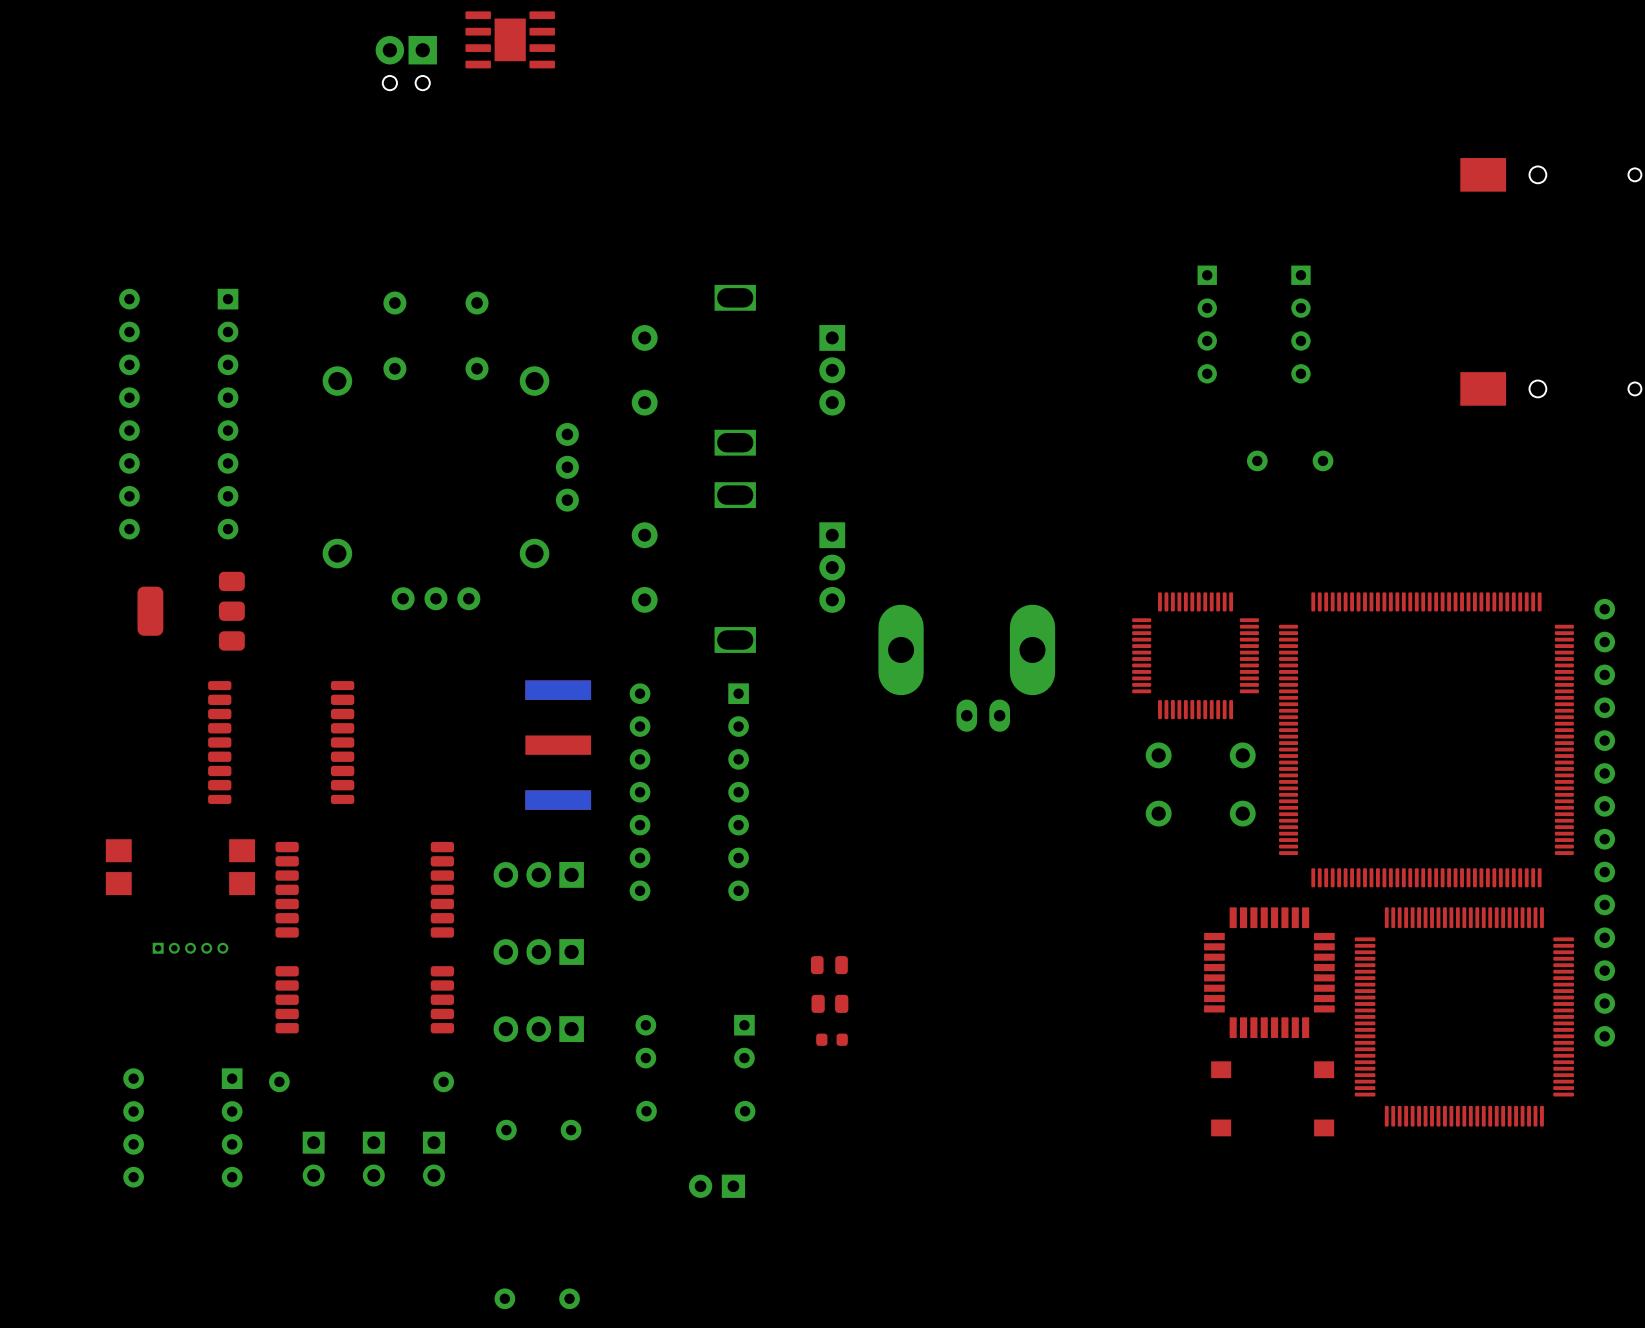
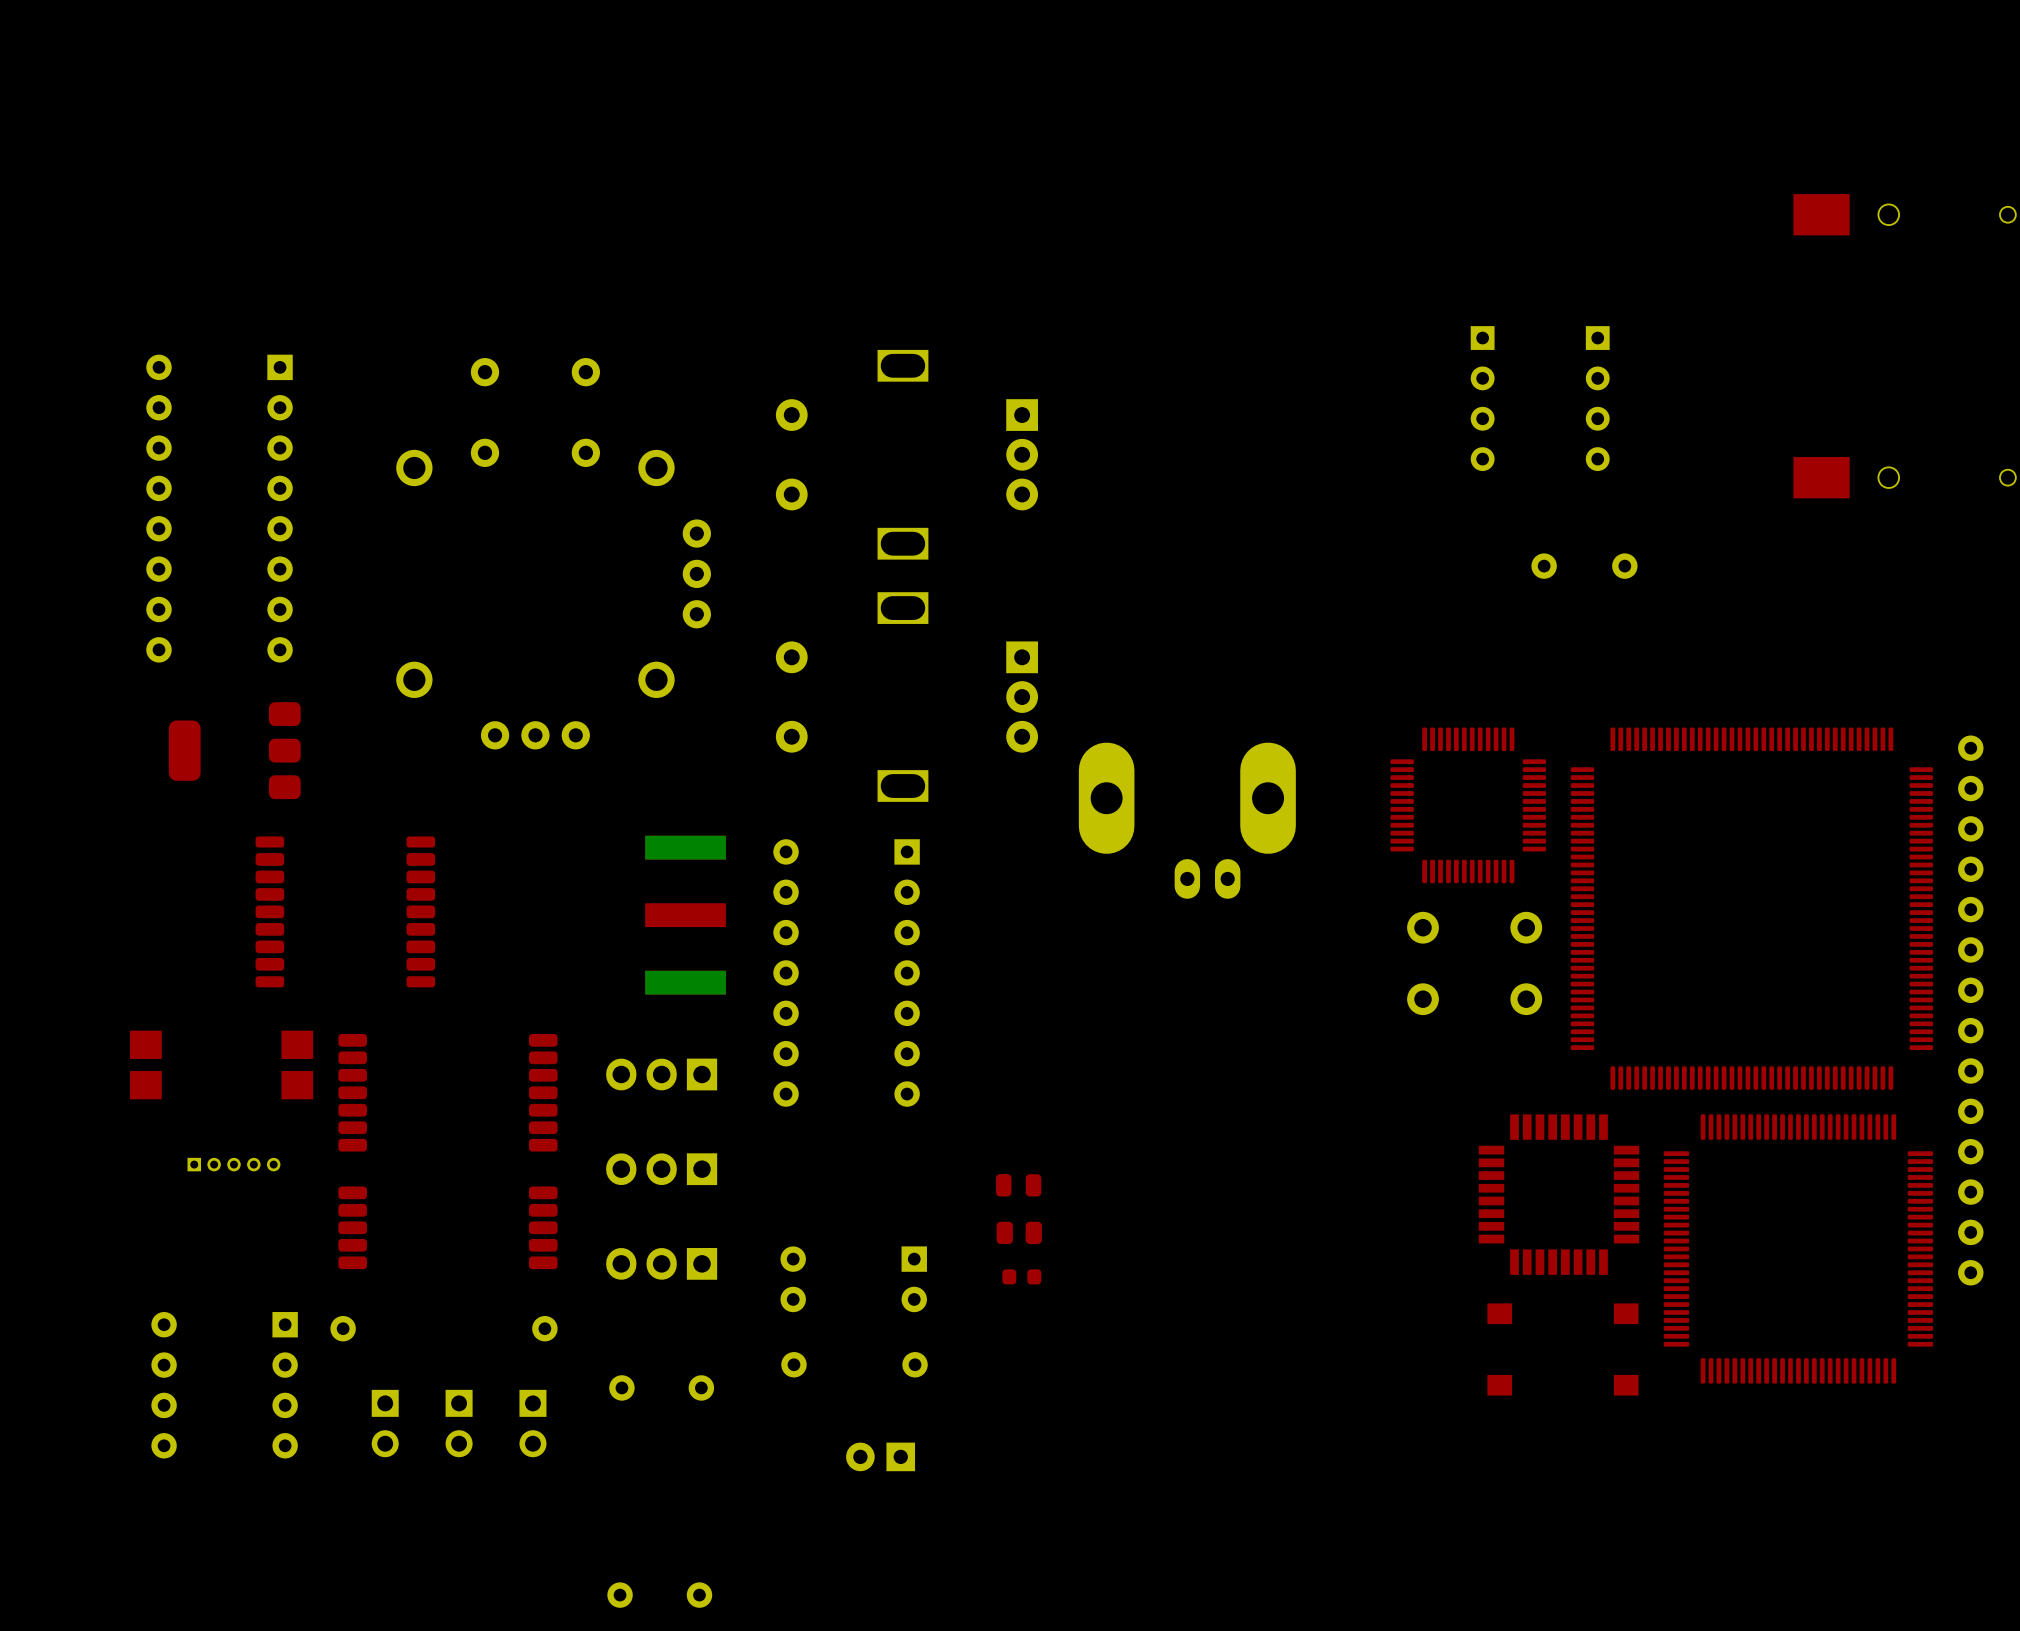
part: (510, 39) -> none
part: (406, 63) -> none

